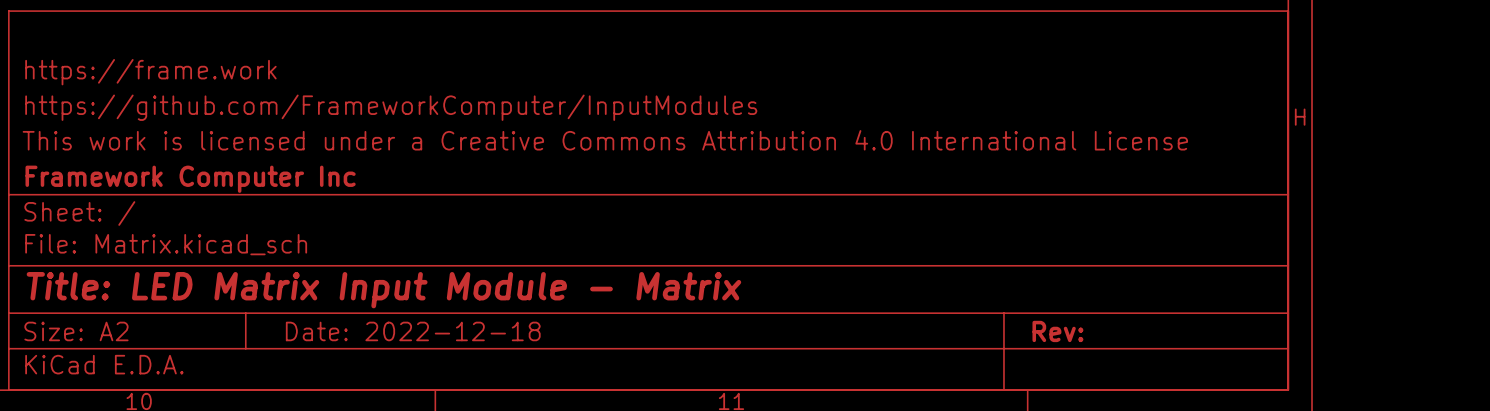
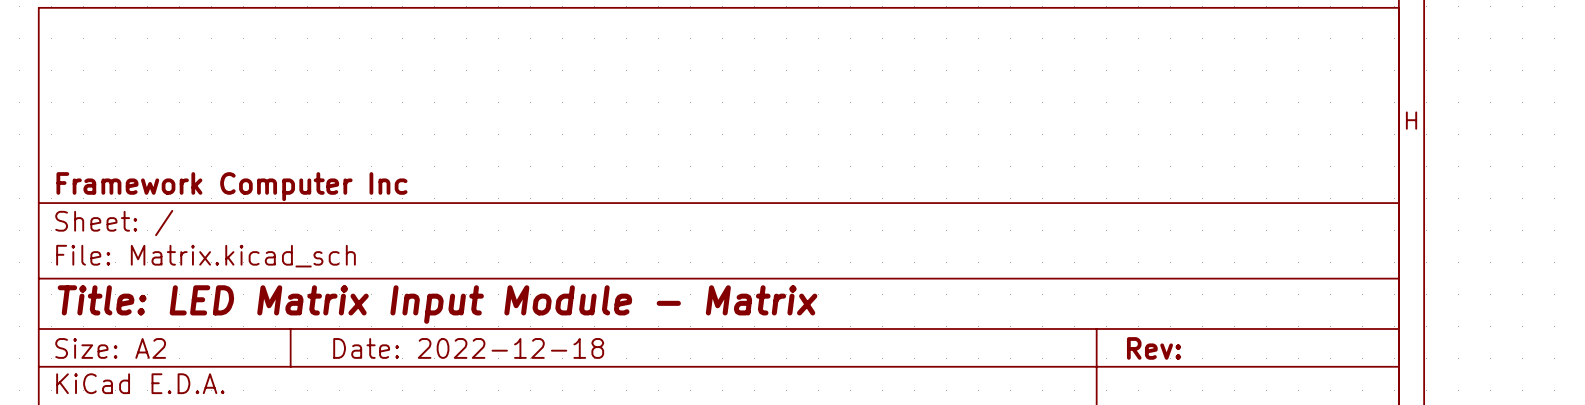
title block: https://frame.work (150, 72) -> none
title block: https://github.com/FrameworkComputer/InputModules (391, 107) -> none
title block: This work is licensed under a Creative Commons Attribution 4.0 International License (605, 140) -> none

